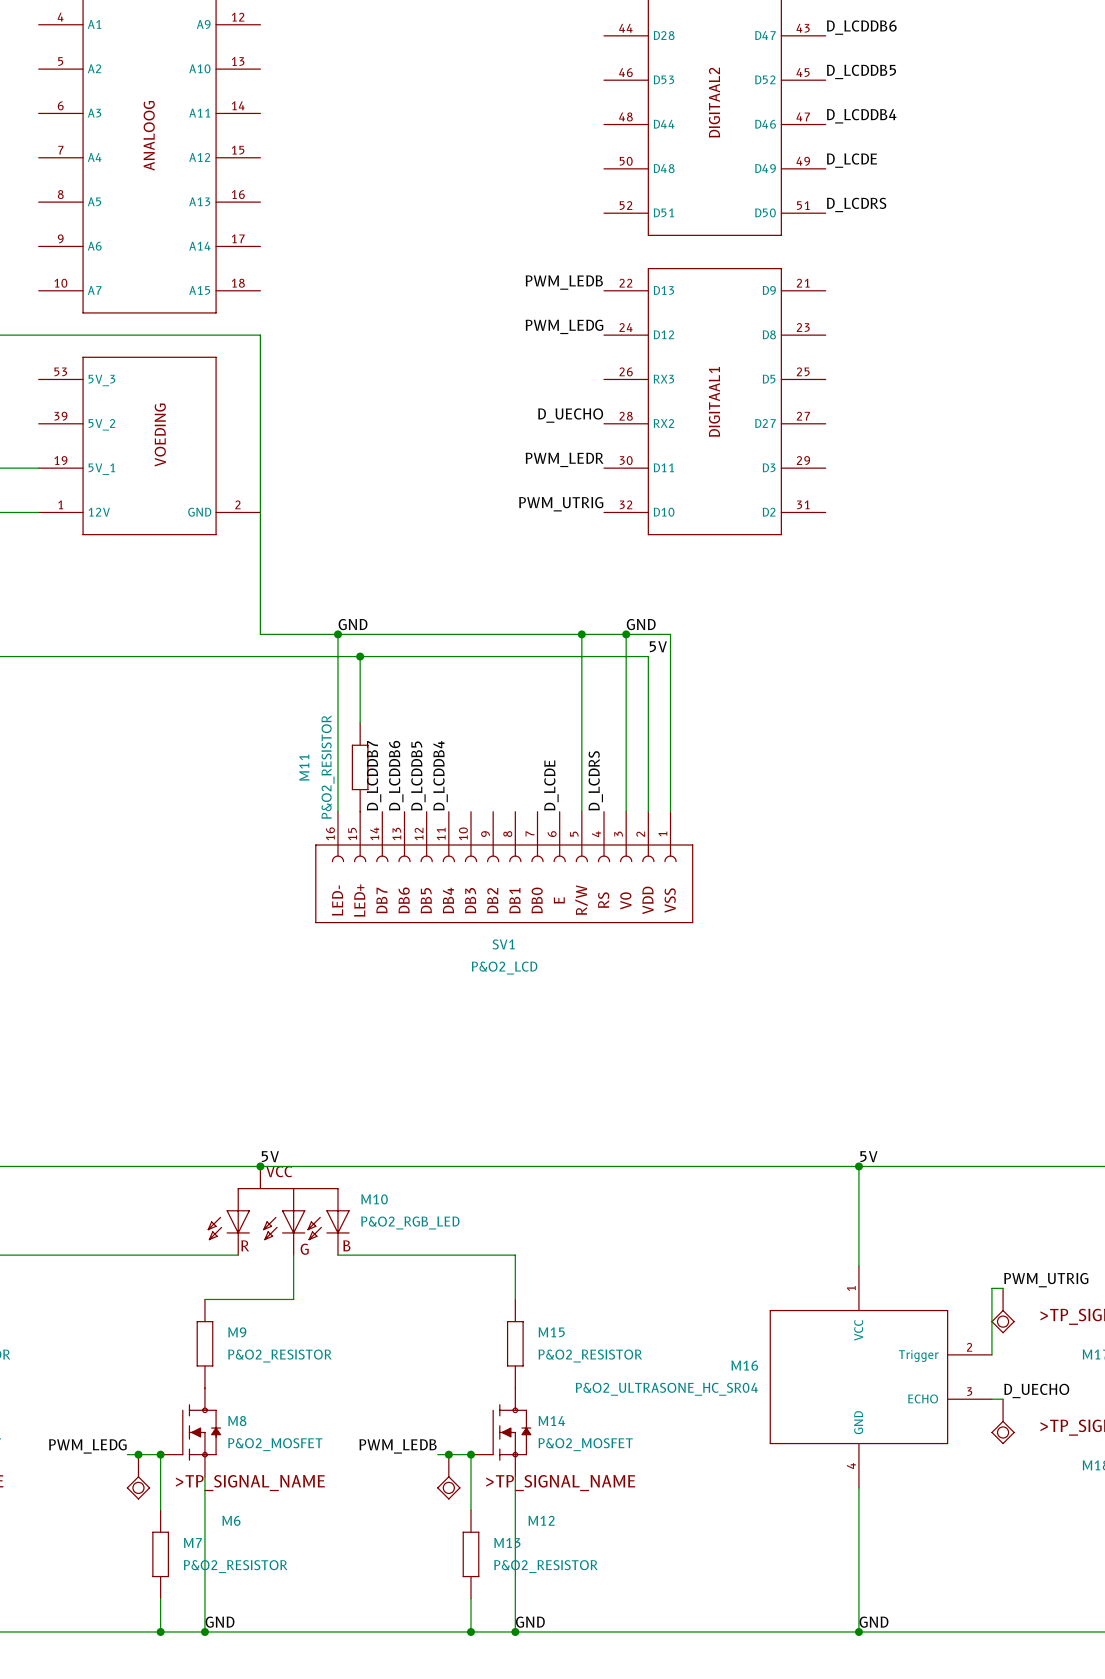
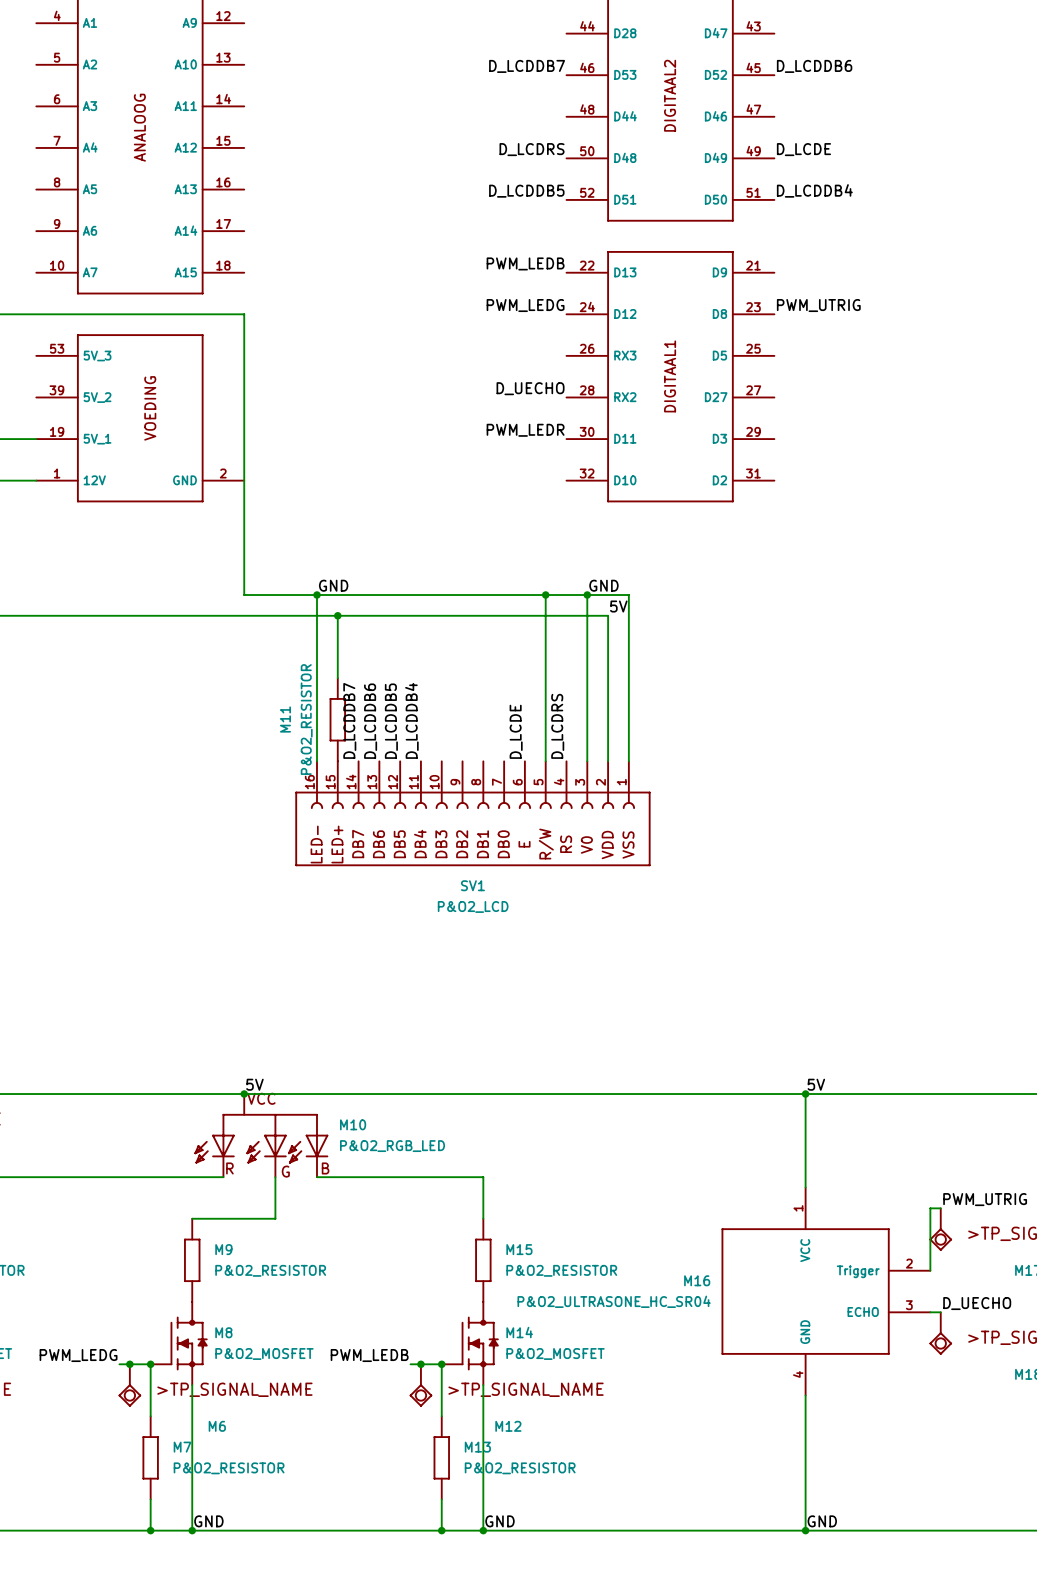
label: D_LCDDB6 (861, 27) -> none
label: none -> D_LCDDB7 (527, 66)
label: D_LCDDB5 (861, 71) -> D_LCDDB6 (814, 66)
label: D_LCDDB4 (861, 116) -> none
label: none -> D_LCDRS (532, 149)
label: none -> D_LCDDB5 (526, 191)
label: D_LCDRS (856, 204) -> D_LCDDB4 (814, 190)
label: none -> PWM_UTRIG (818, 305)
label: PWM_UTRIG (561, 504) -> none

